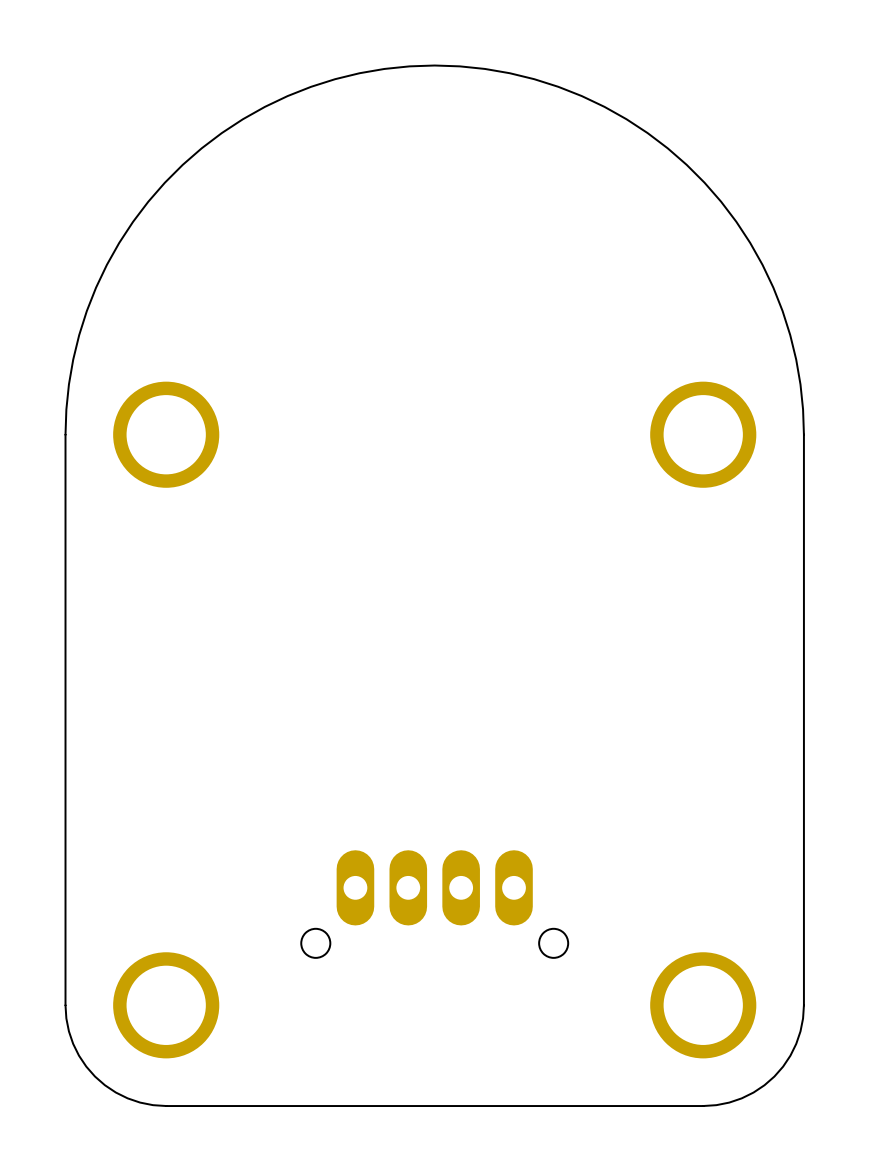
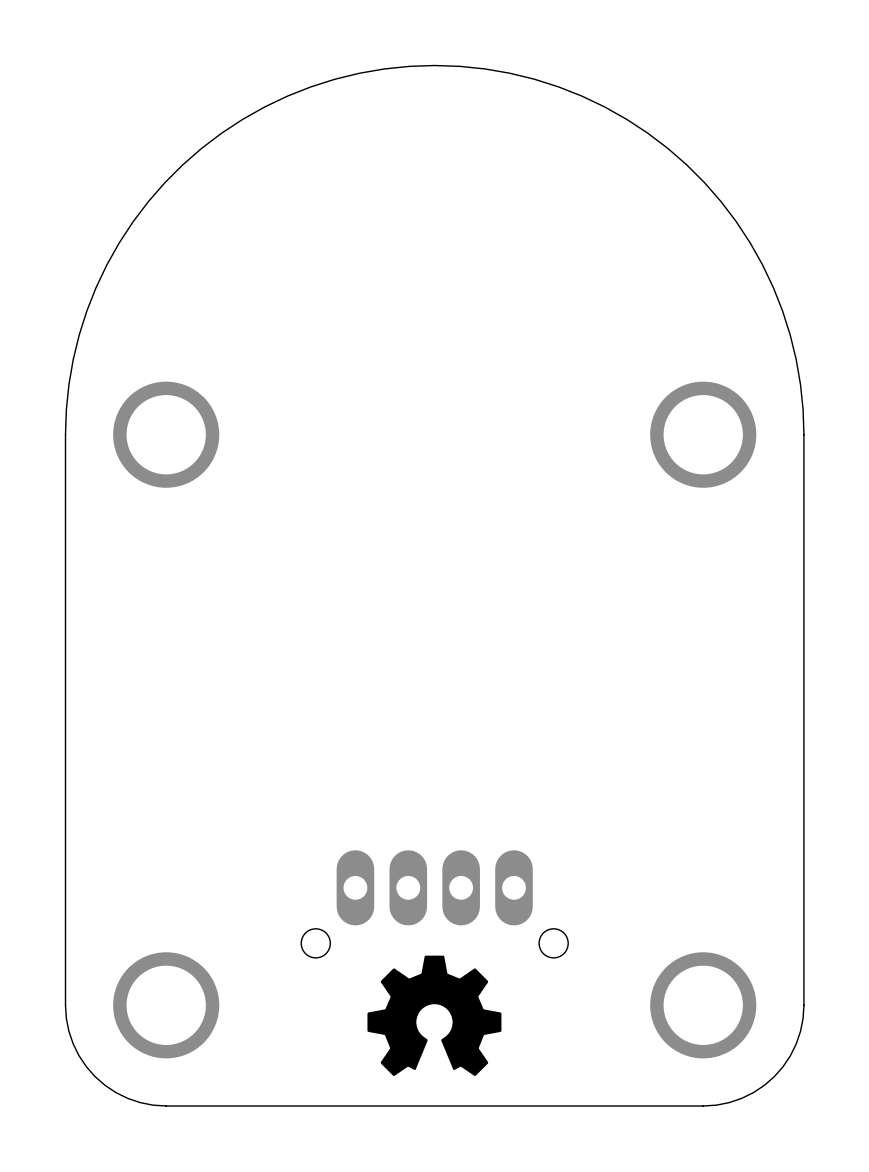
drawing: none -> [367, 955, 502, 1076]

